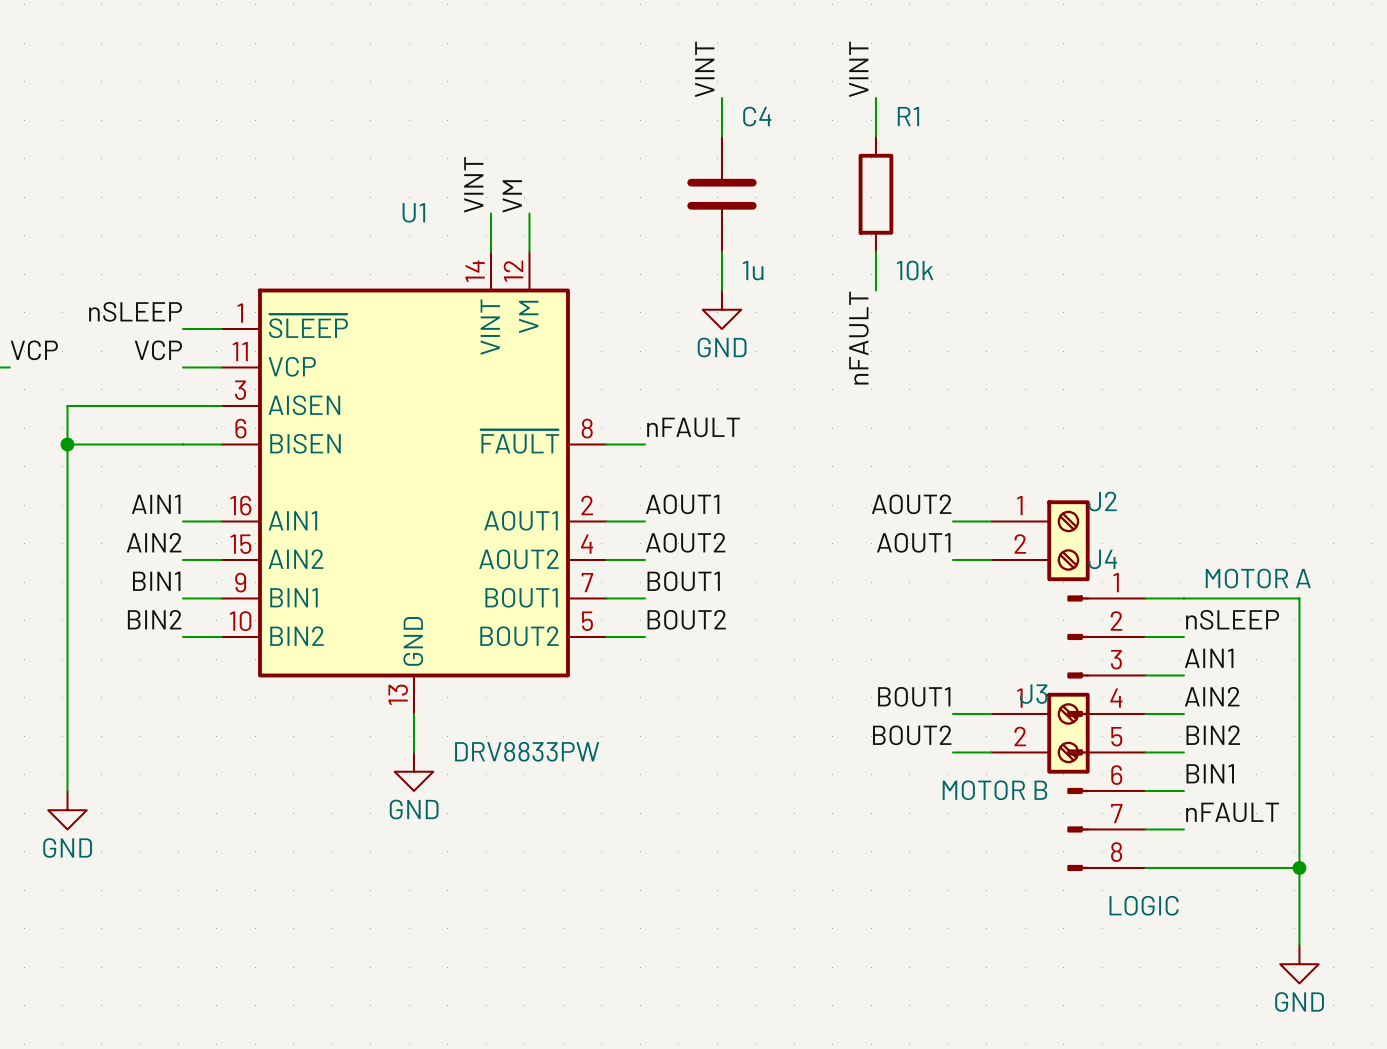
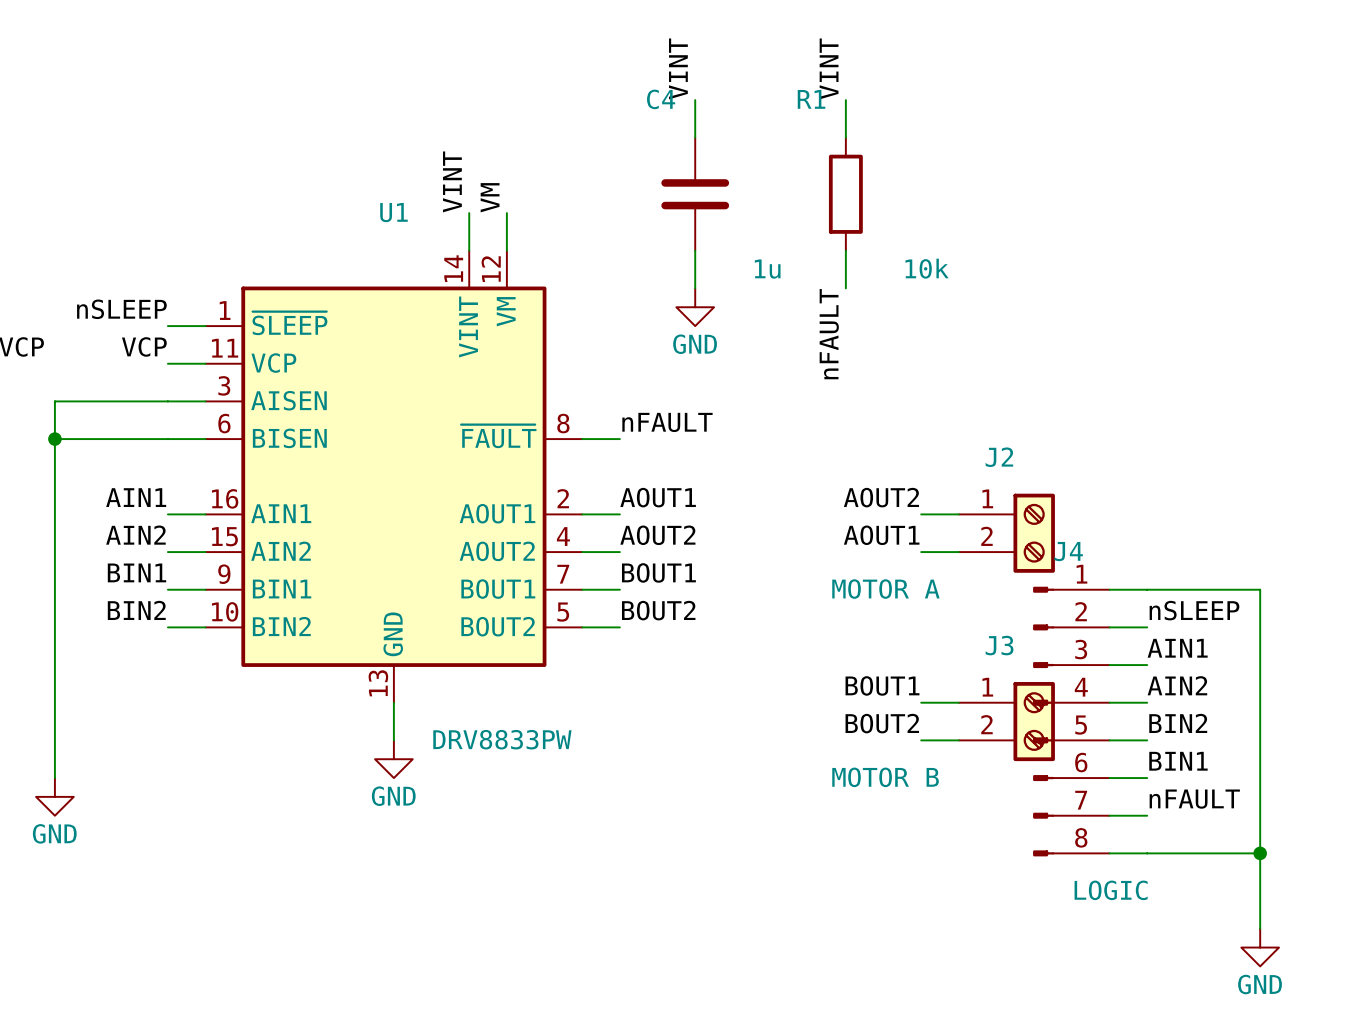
C4 name position: C4 (757, 116) -> C4 (661, 99)
R1 name position: R1 (908, 116) -> R1 (811, 99)
C4 value position: 1u (753, 270) -> 1u (767, 269)
R1 value position: 10k (915, 270) -> 10k (927, 268)
J2 name position: J2 (1102, 501) -> J2 (999, 457)
J2 value position: MOTOR A (1258, 578) -> MOTOR A (885, 589)
J3 name position: J3 (1033, 694) -> J3 (999, 645)
J3 value position: MOTOR B (994, 790) -> MOTOR B (885, 777)

